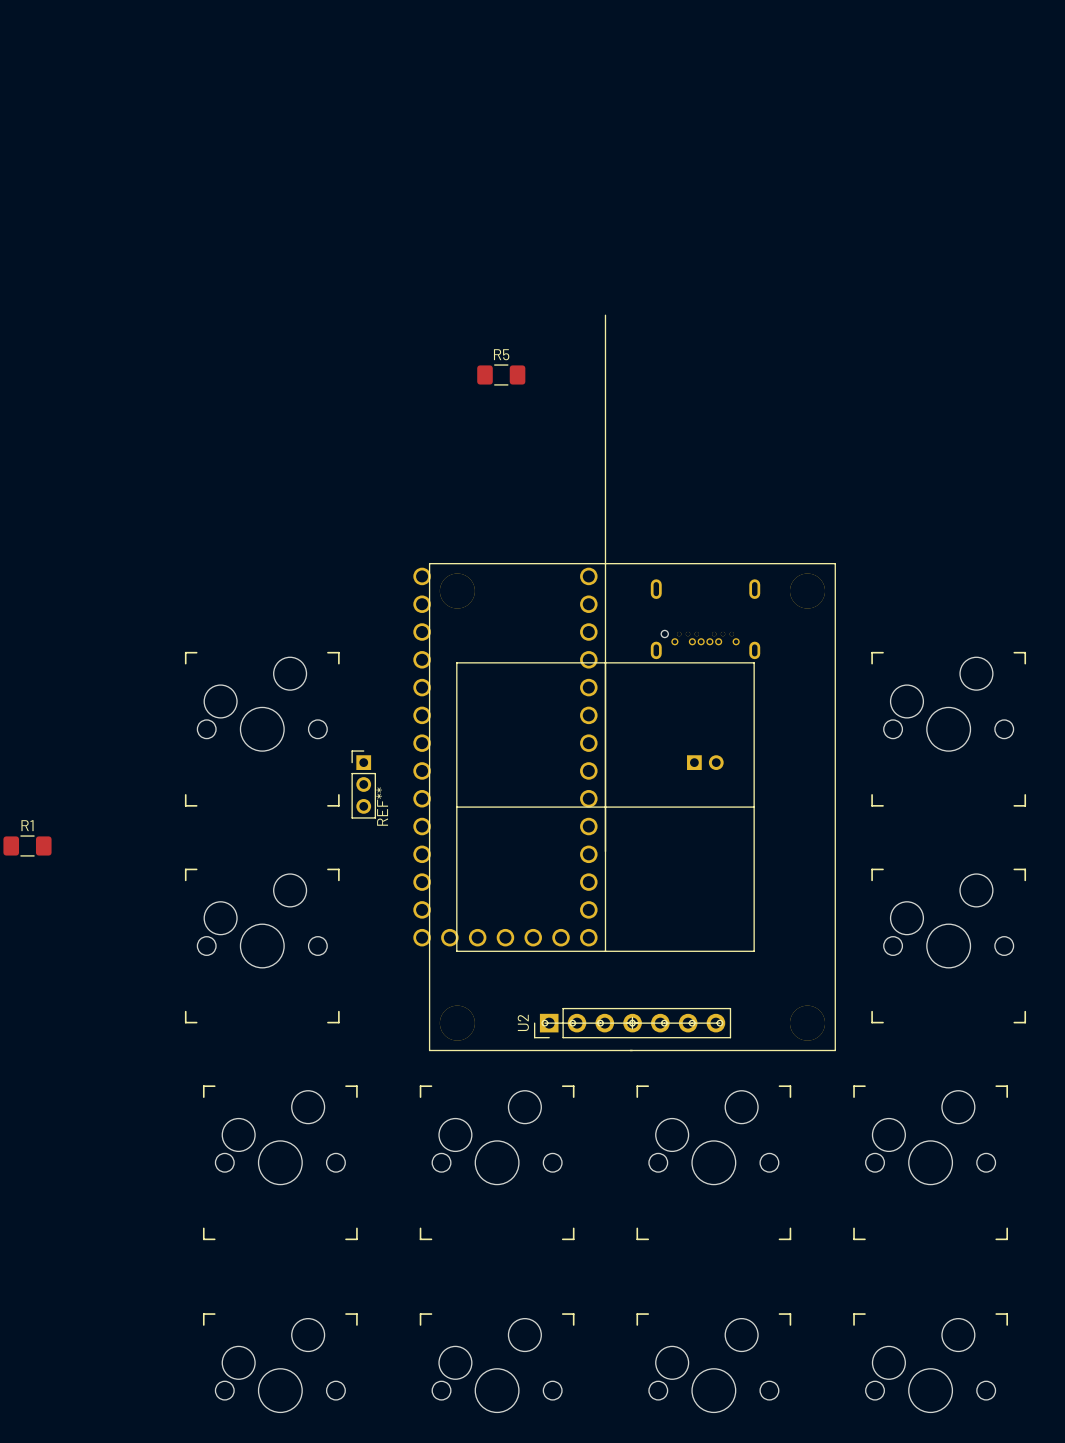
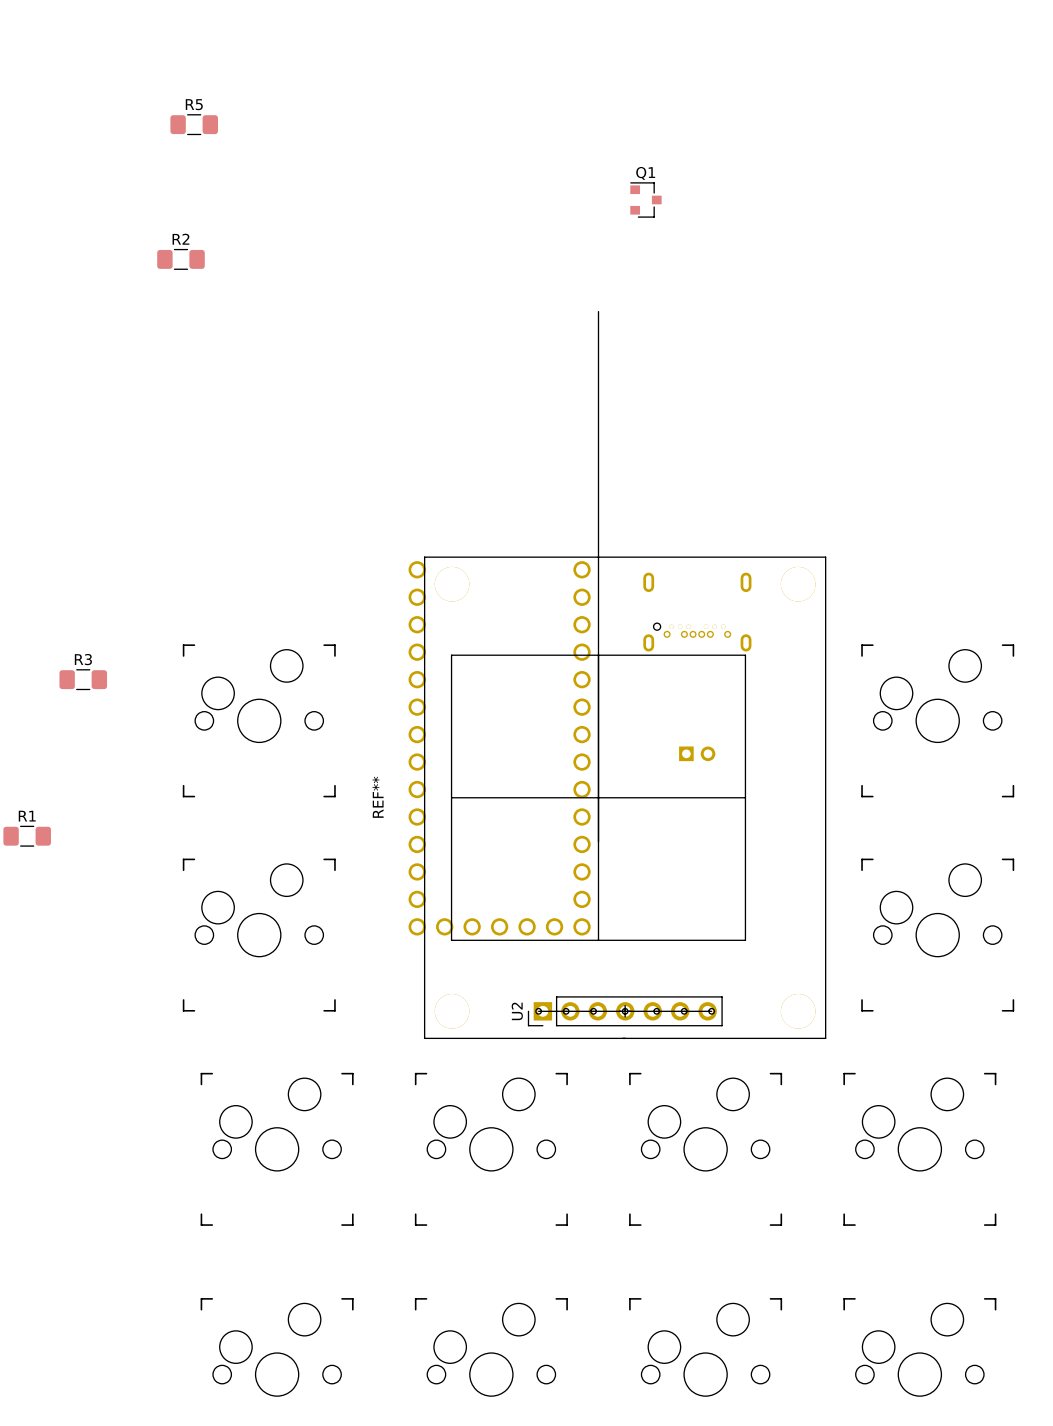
Q1: none -> (645, 199)
R2: none -> (180, 259)
R5 position: (501, 374) -> (194, 124)
R3: none -> (83, 679)
part: (363, 784) -> none

